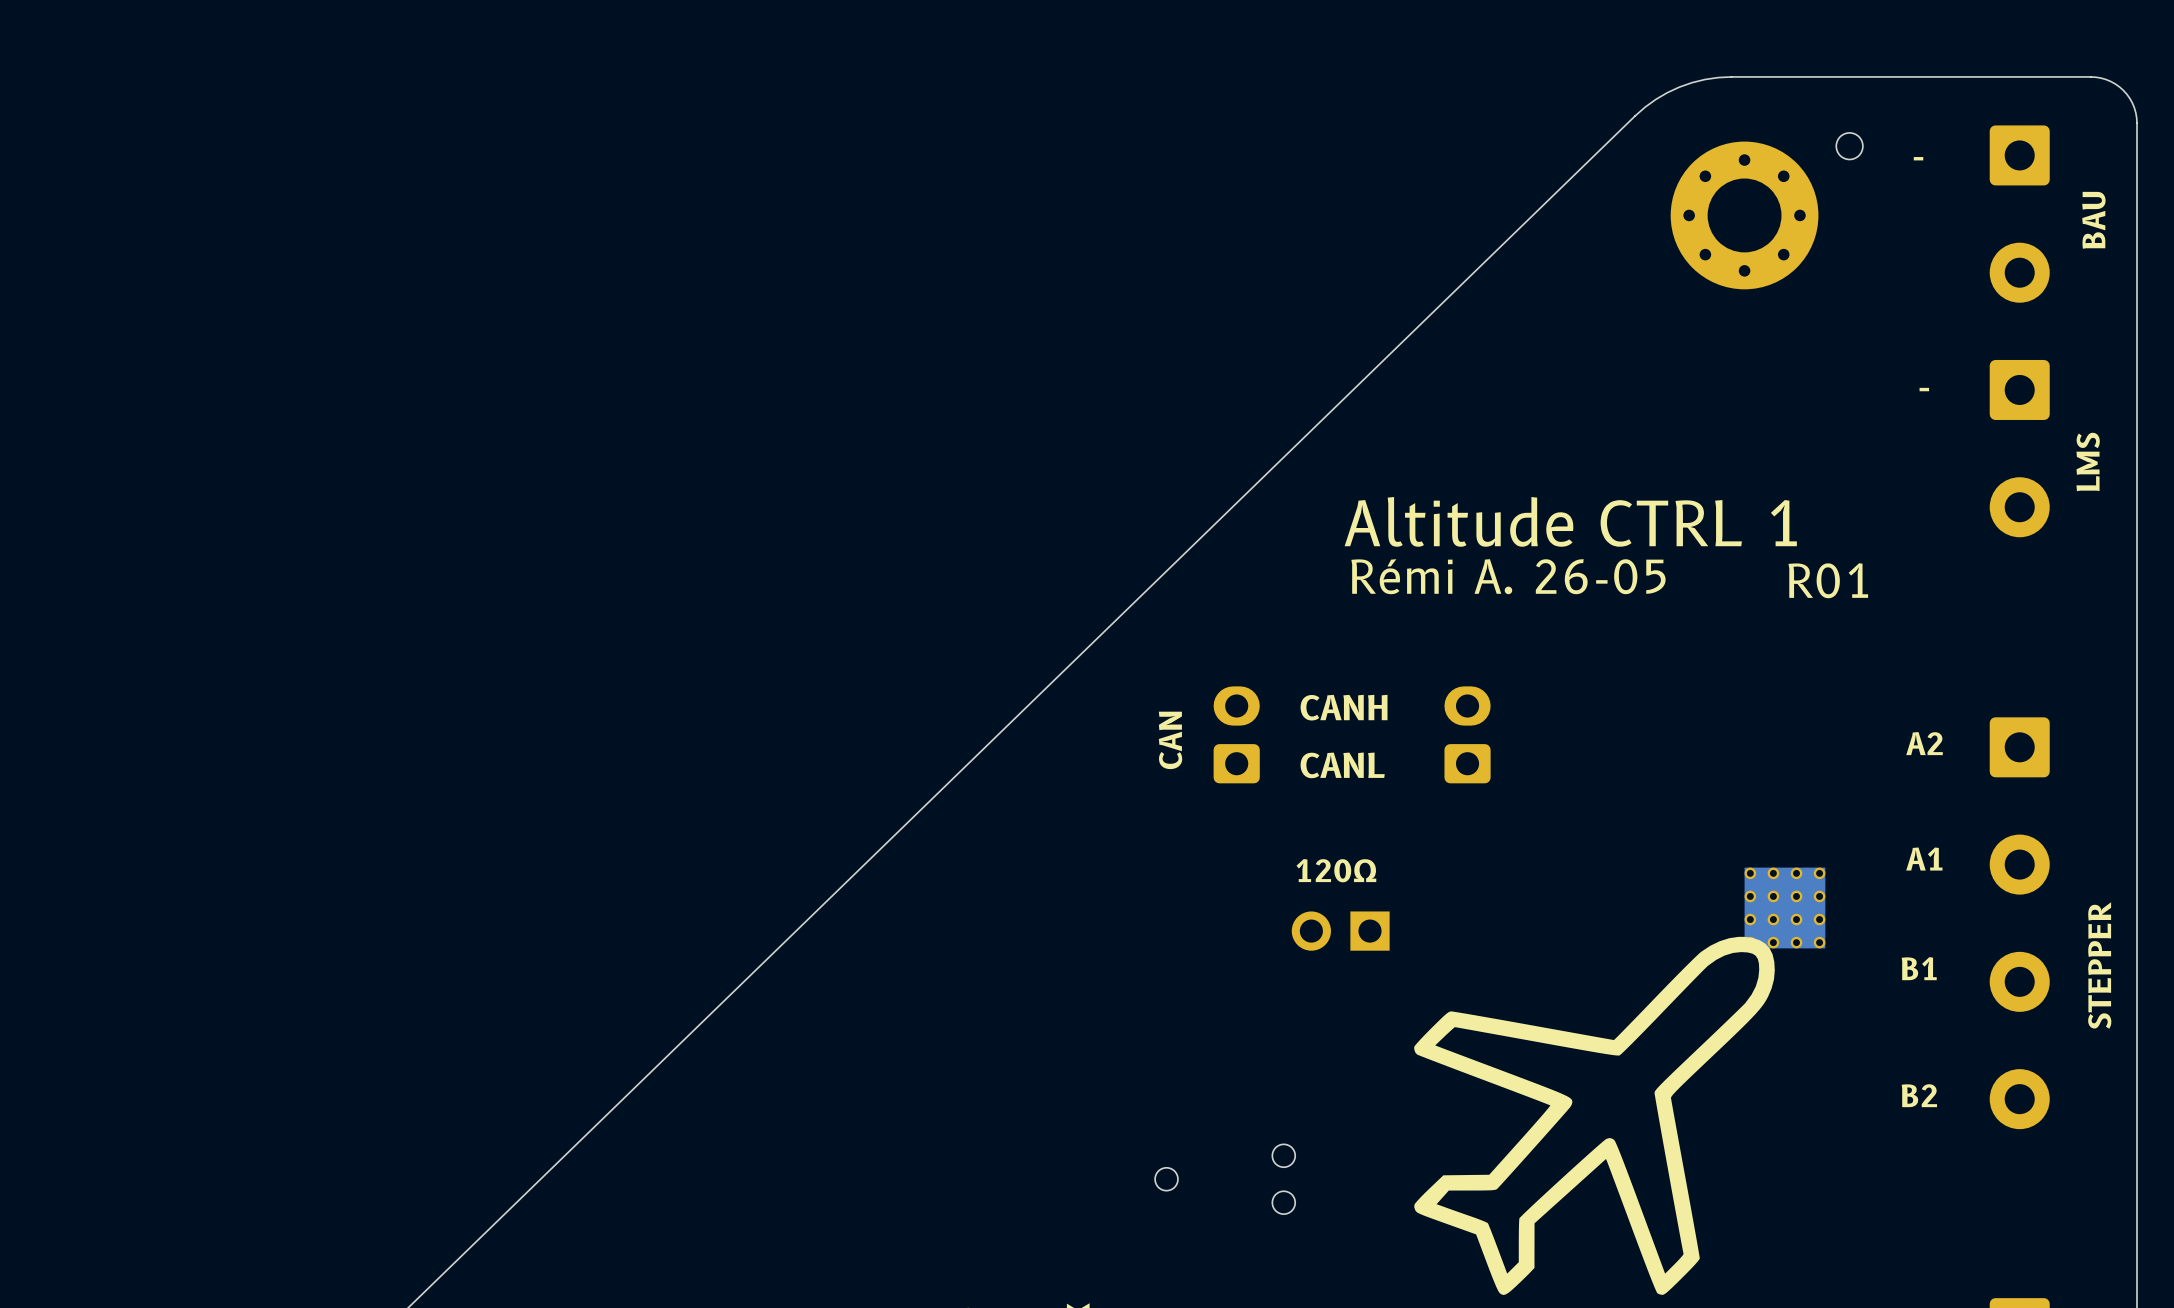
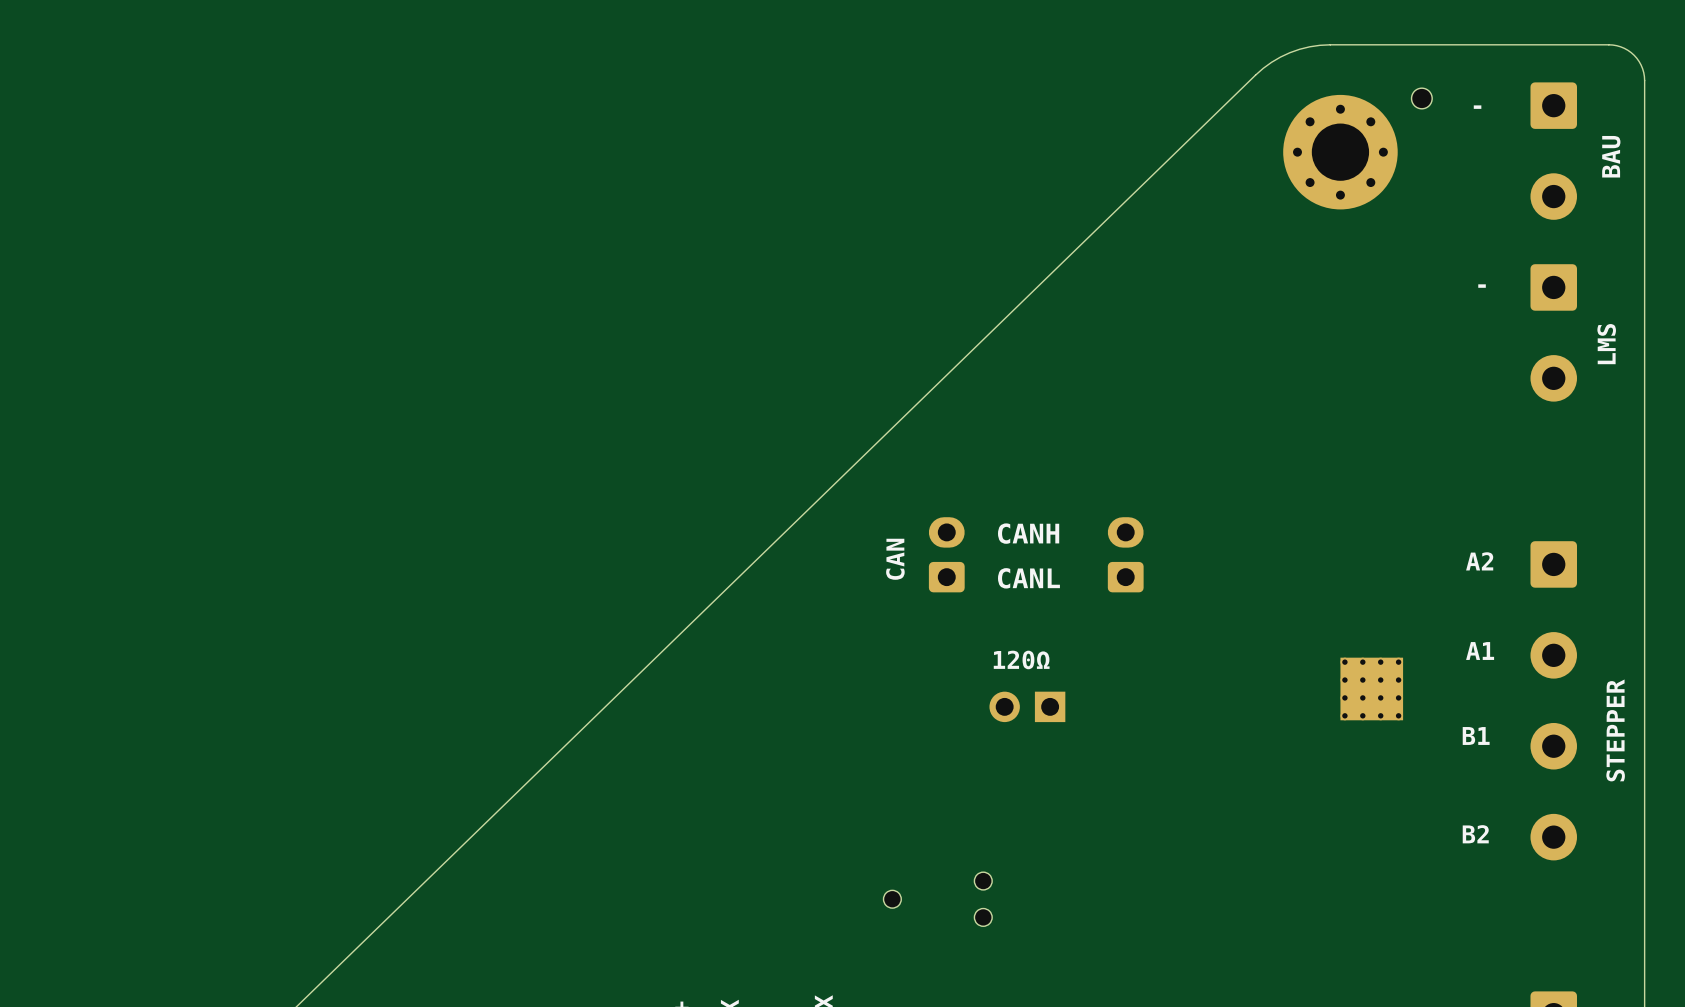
text: Altitude CTRL 1 (1570, 521) -> none
text: Rémi A. 26-05 (1508, 576) -> none
text: R01 (1828, 580) -> none
drawing: [1414, 936, 1775, 1295] -> none

